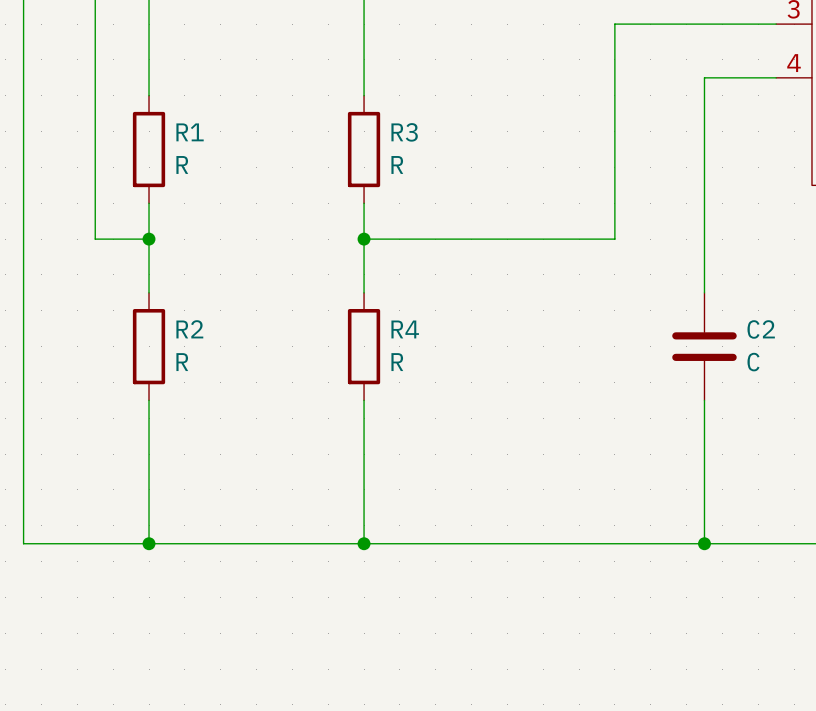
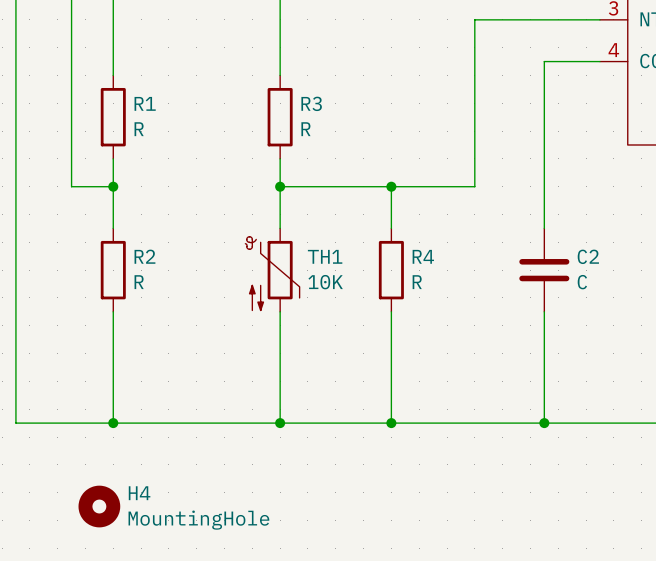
wire: none -> (391, 186) (391, 228)
junction: none -> (391, 186)
TH1: none -> 10K (272, 270)
R4 position: (364, 346) -> (391, 270)
wire: none -> (391, 311) (391, 423)
junction: none -> (391, 423)
H4: none -> MountingHole (99, 506)

